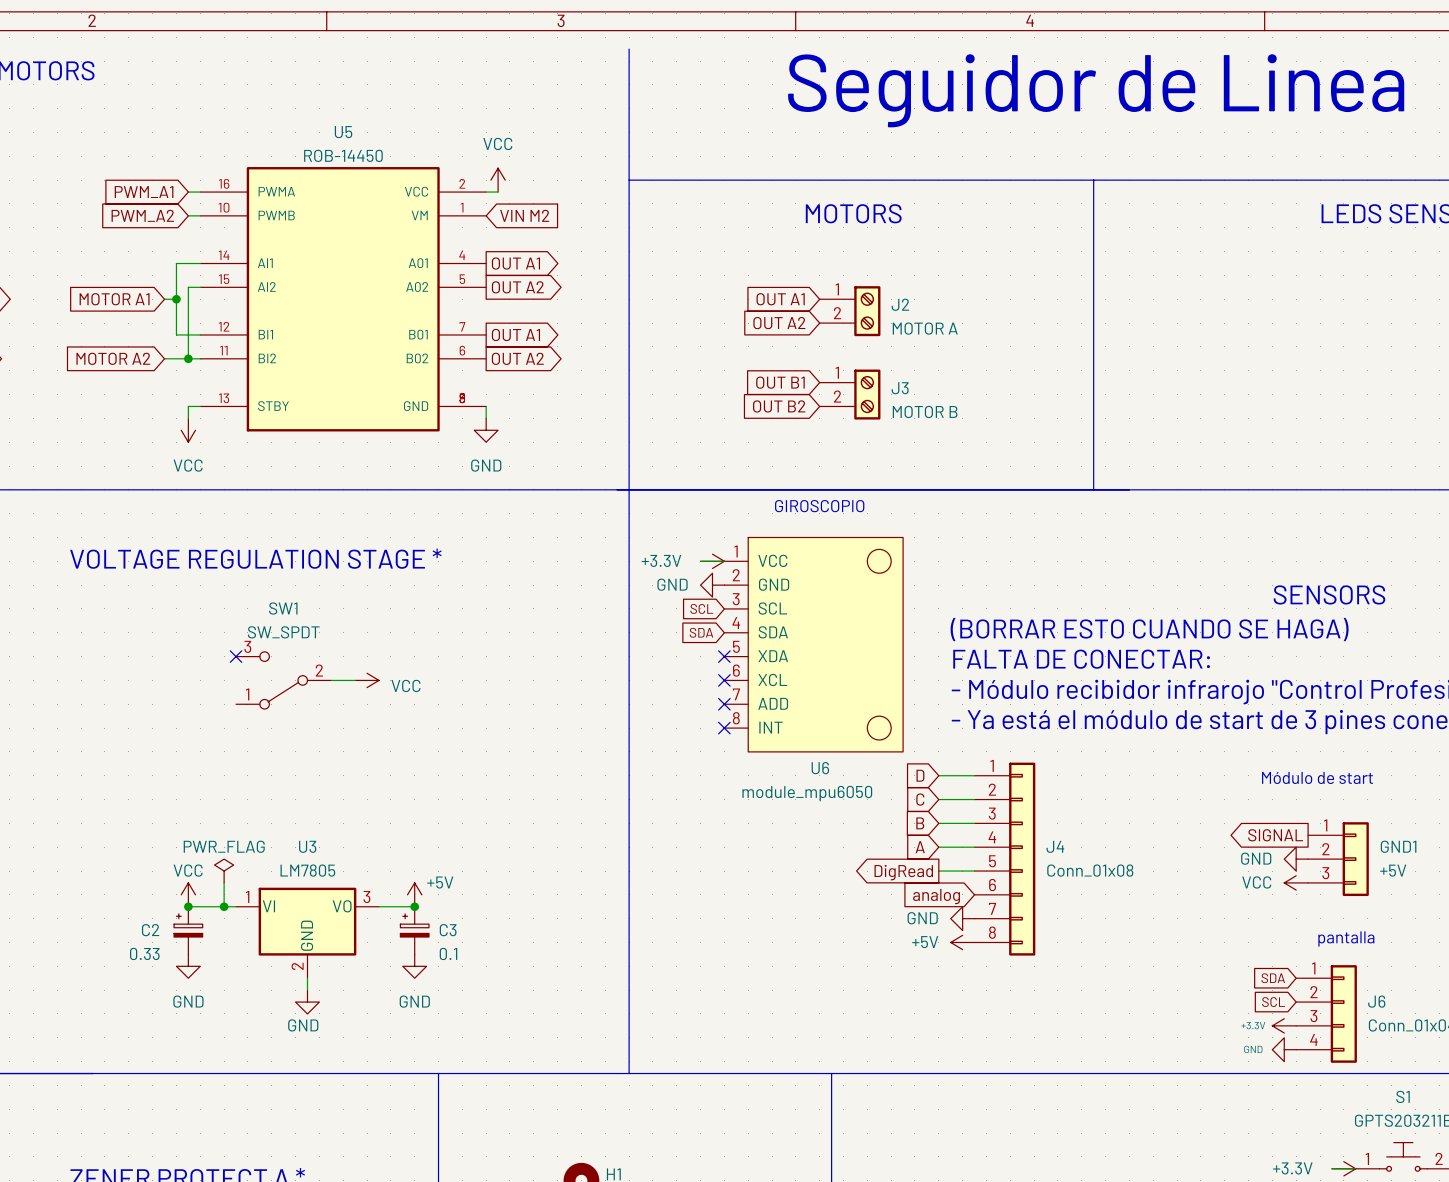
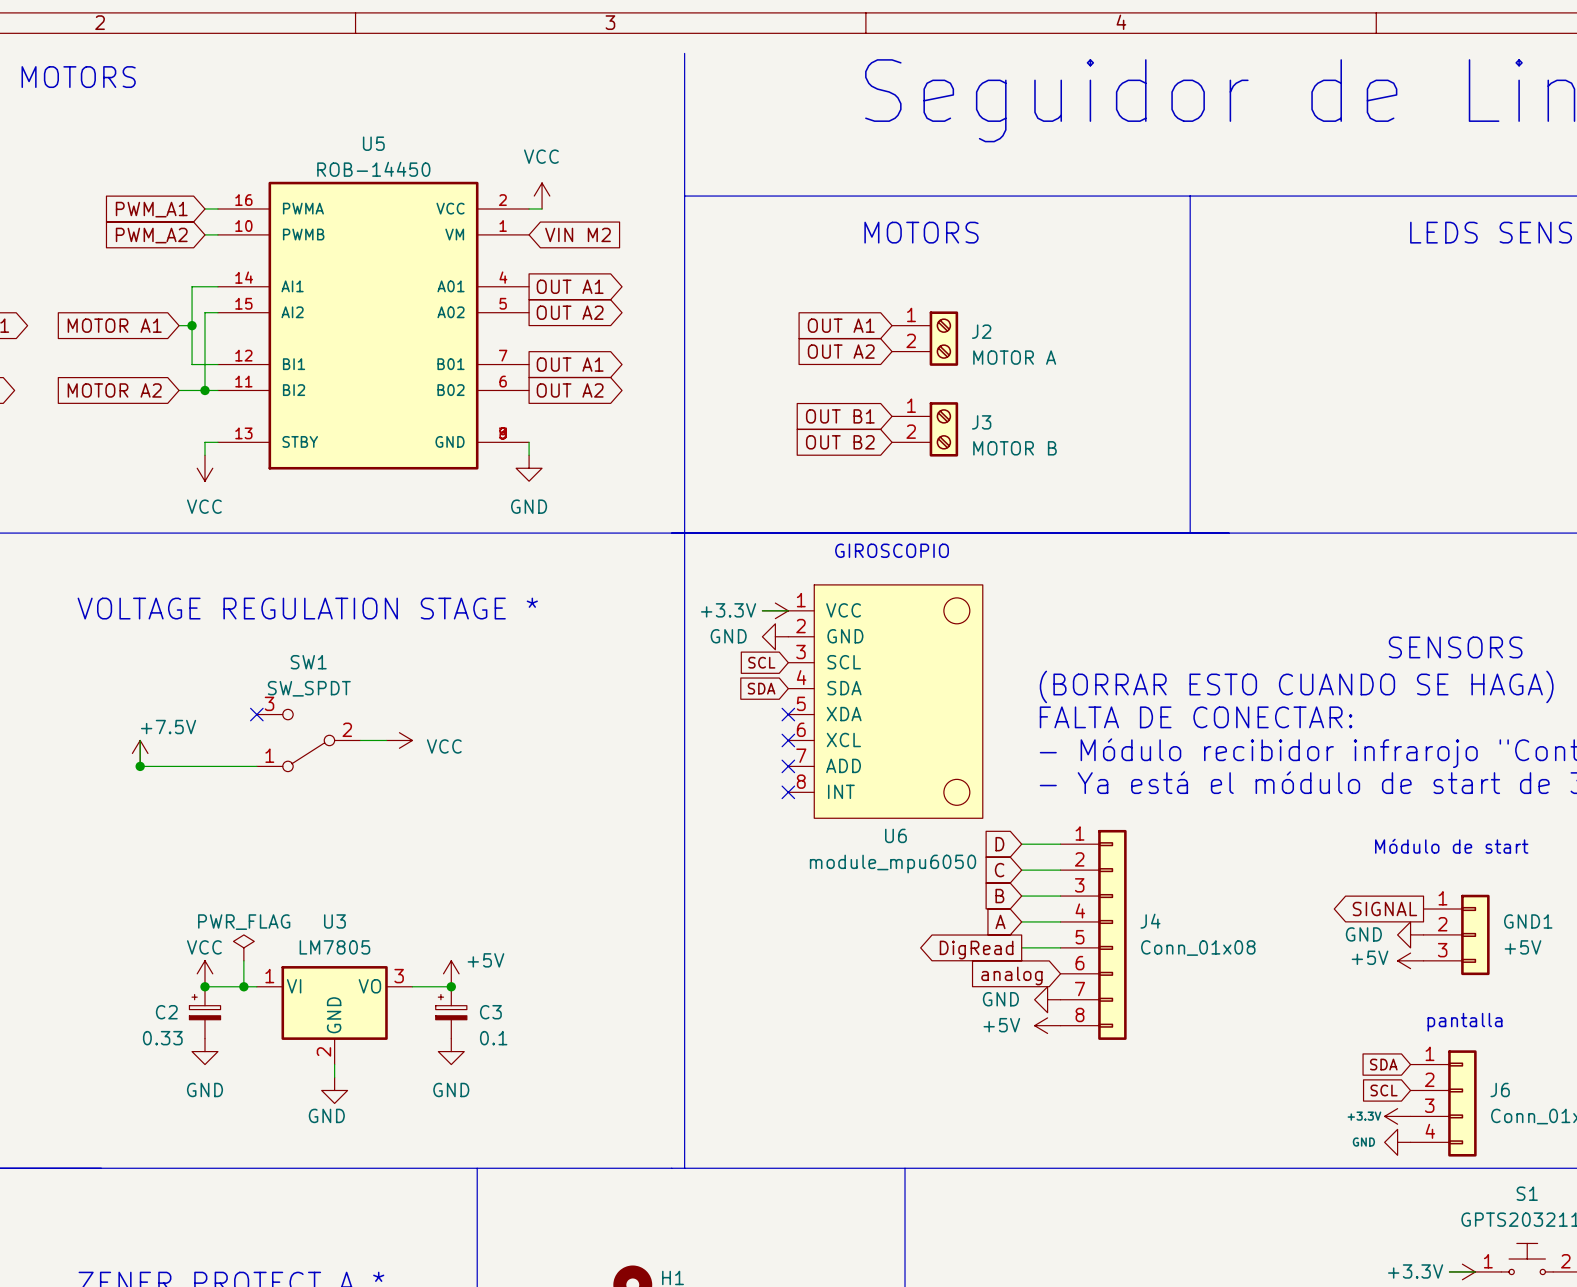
wire: none -> (140, 740) (140, 766) (256, 766)
power symbol: none -> +7.5V (140, 753)
junction: none -> (140, 766)
power symbol: VCC (1296, 882) -> +5V (1410, 960)

